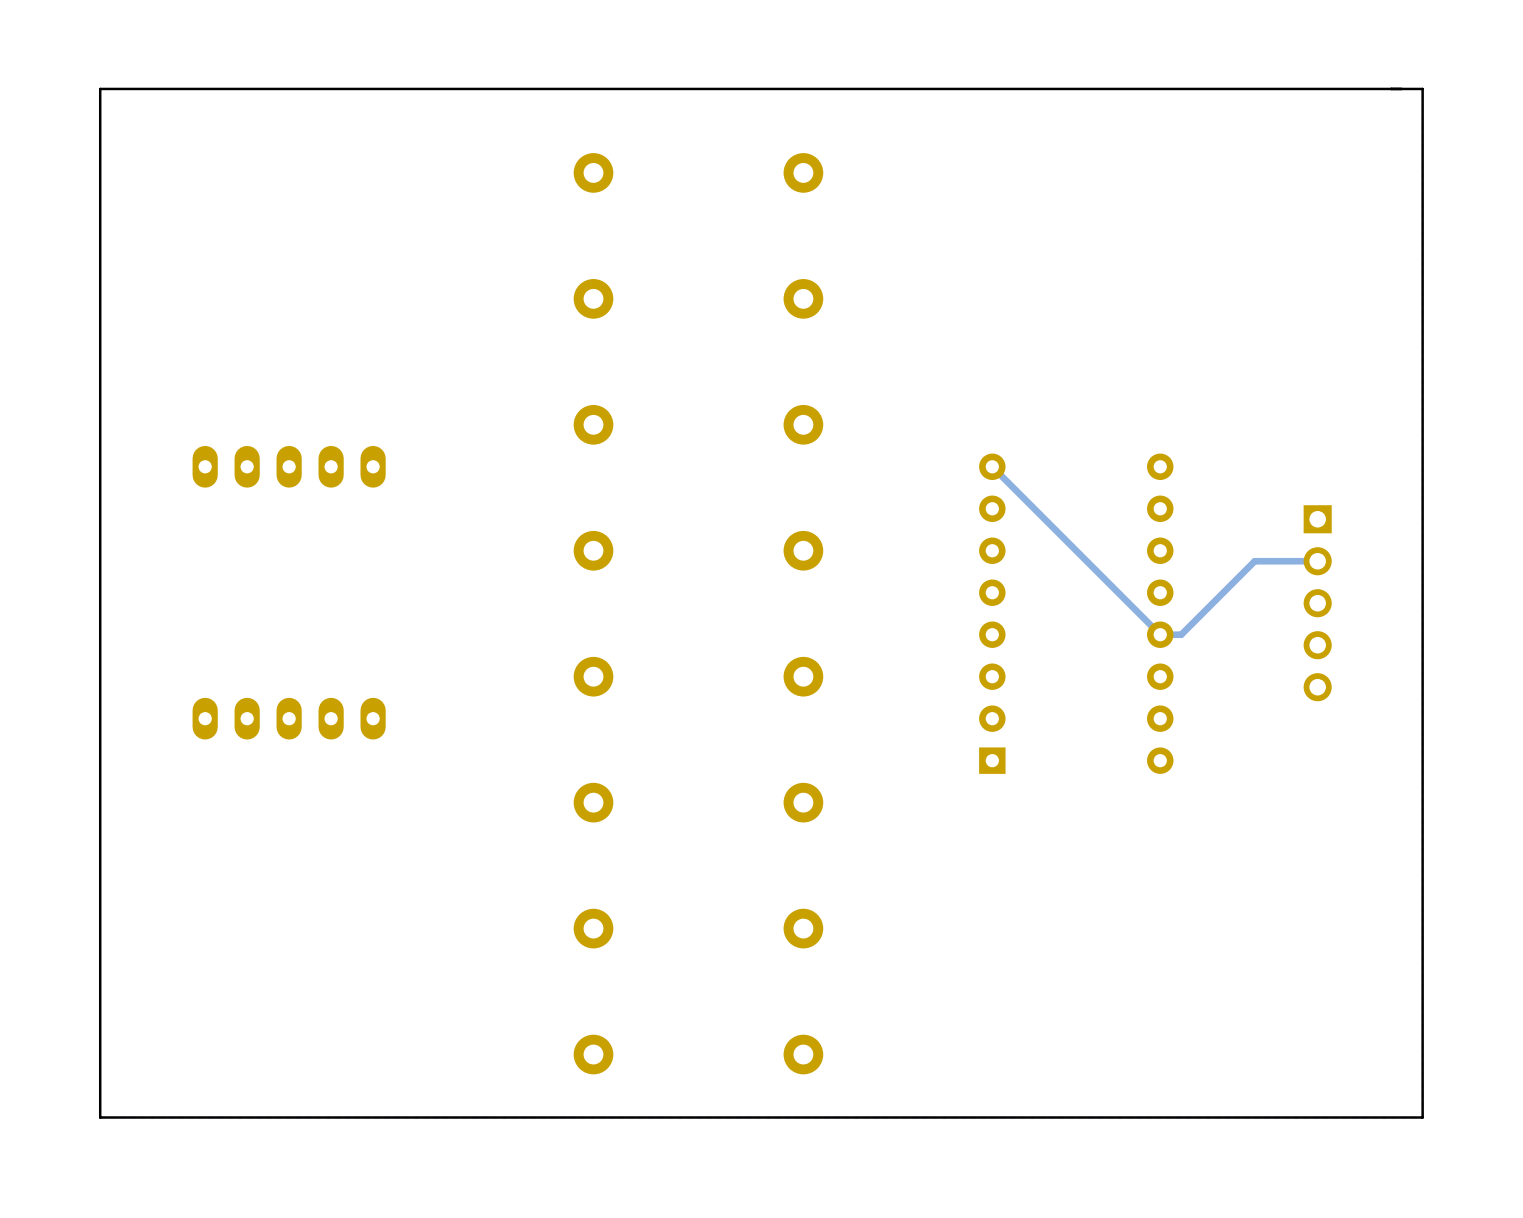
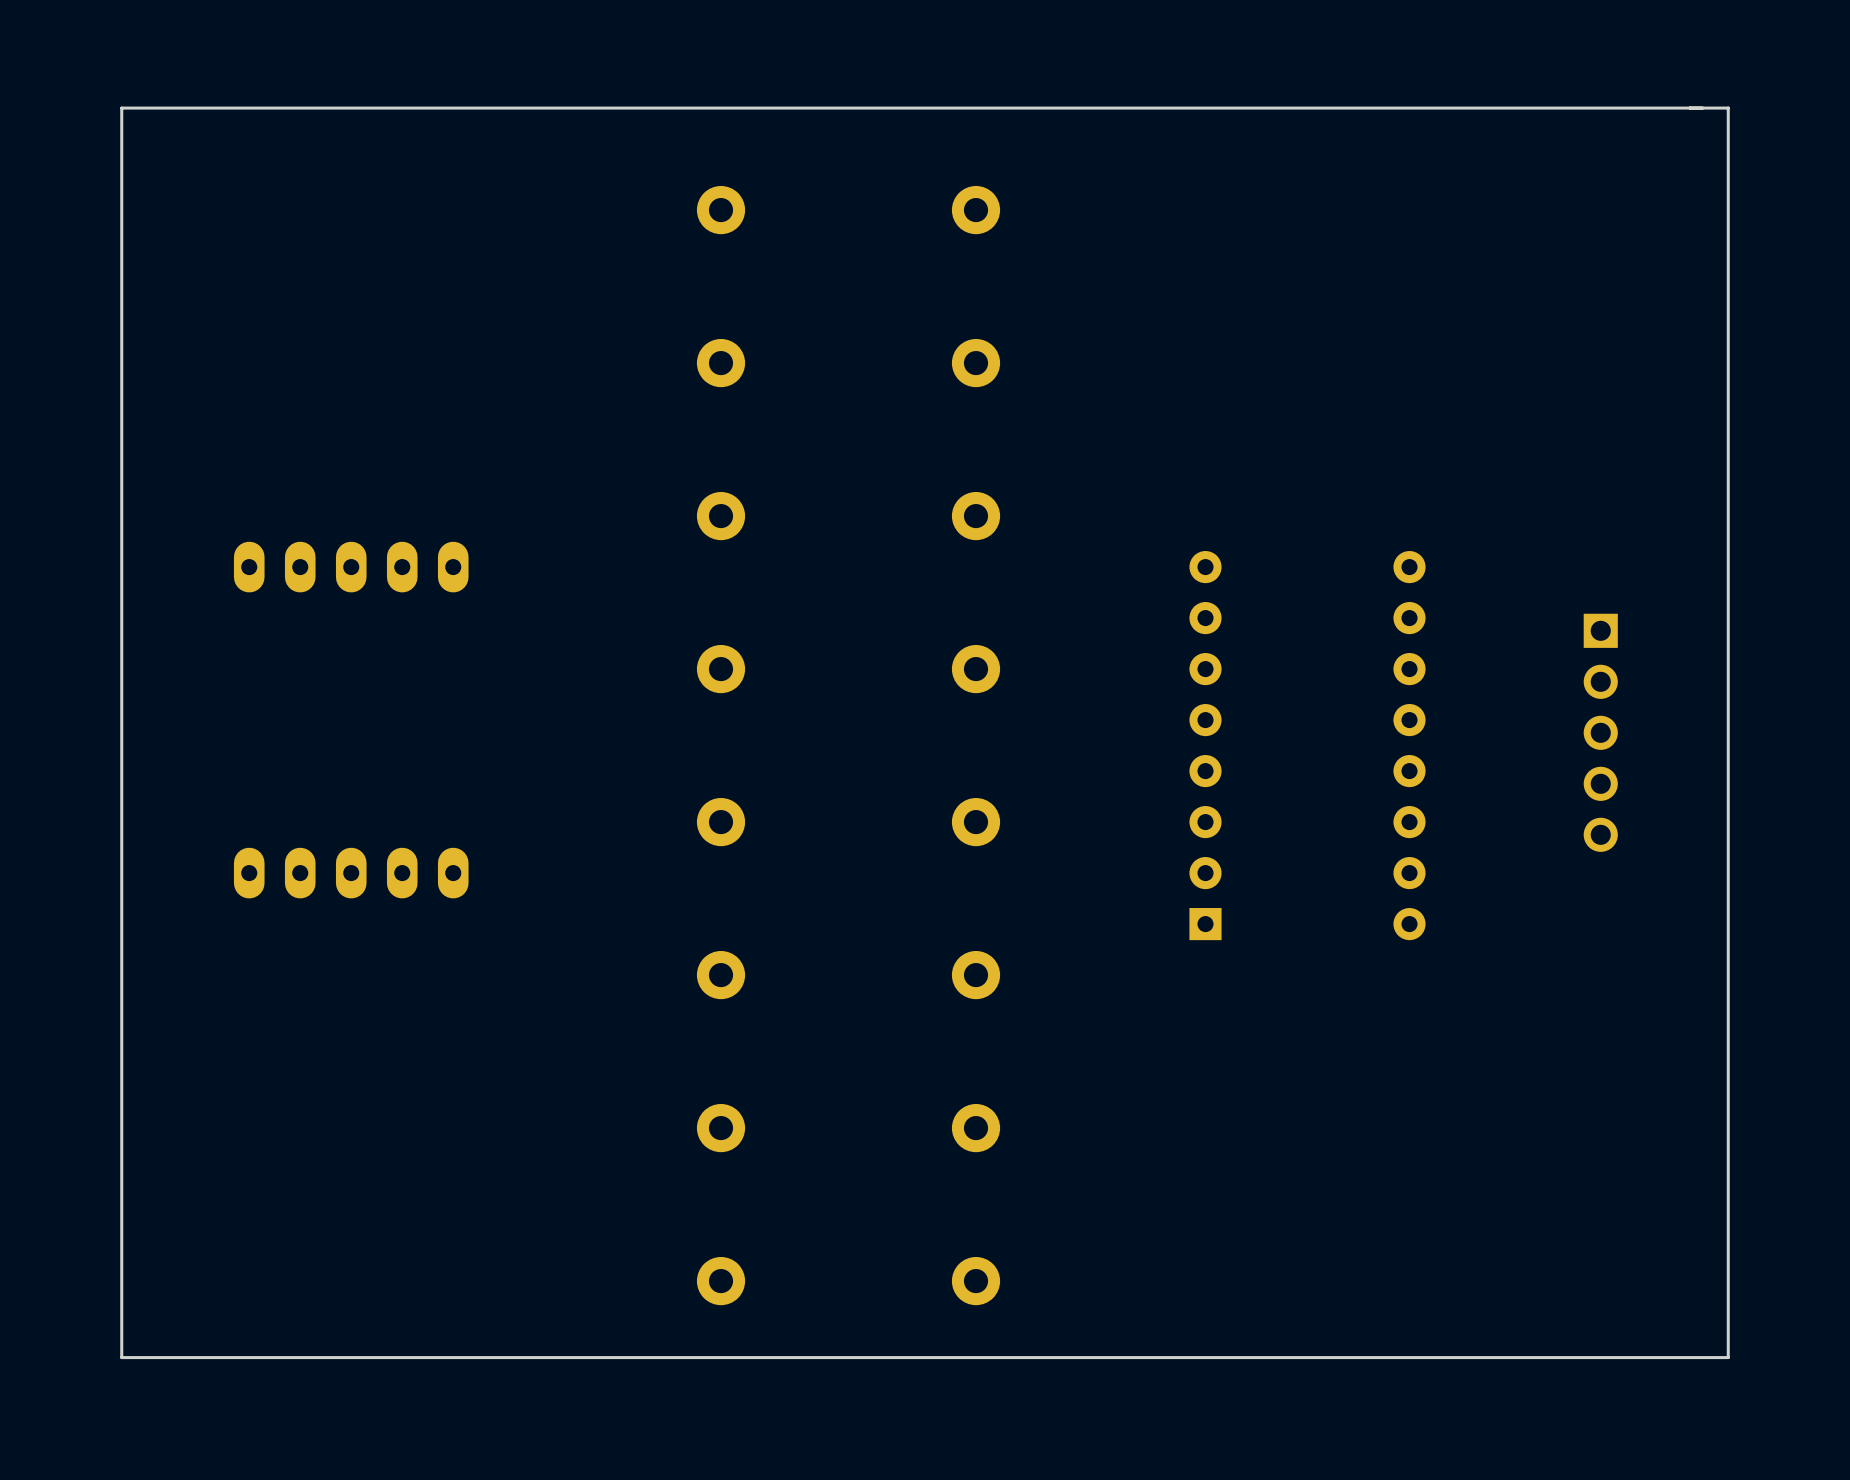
track: (992, 466) (1160, 634) (1181, 634) (1254, 561) (1317, 561) -> none

